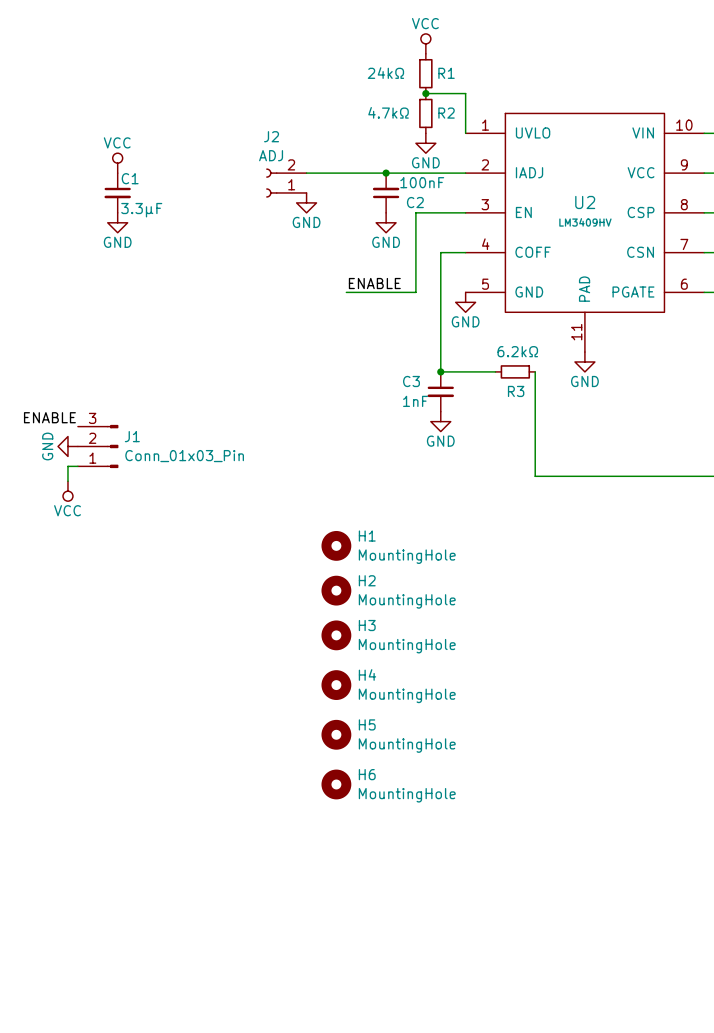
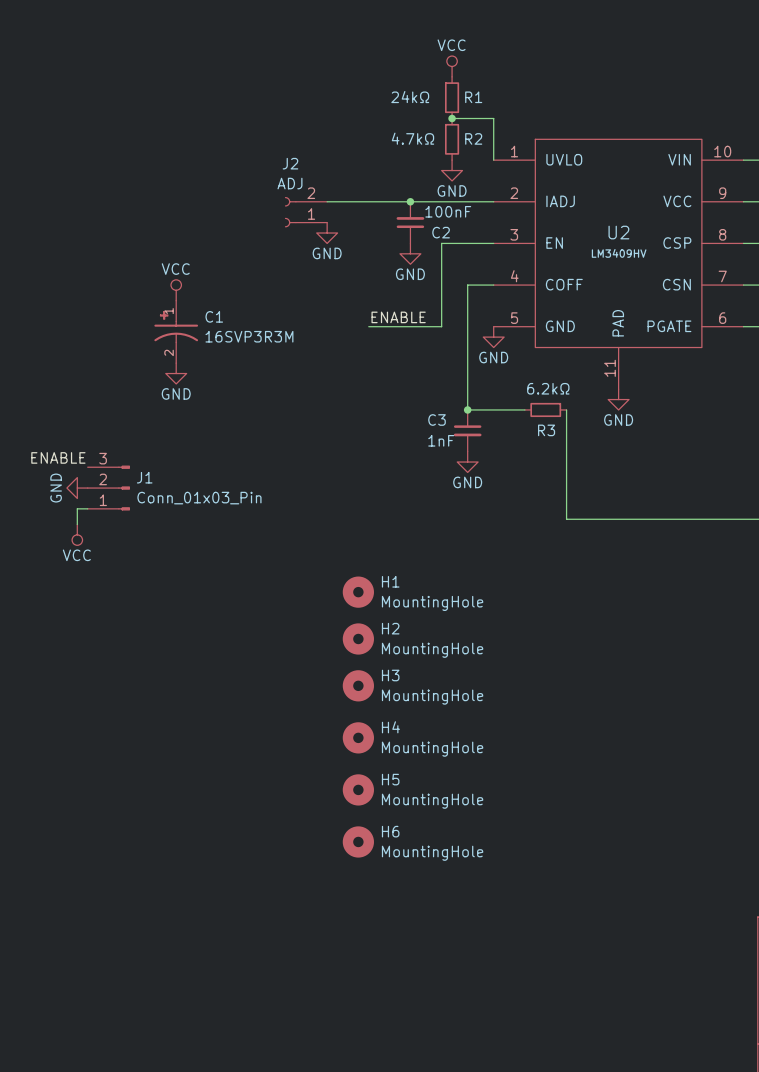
power symbol position: VCC (117, 163) -> VCC (176, 290)
C1 symbol: [104, 173, 131, 213] -> [154, 300, 199, 364]
C1 name position: C1 (130, 178) -> C1 (214, 316)
C1 value: 3.3µF (141, 210) -> 16SVP3R3M (249, 336)
power symbol position: GND (117, 222) -> GND (176, 373)

